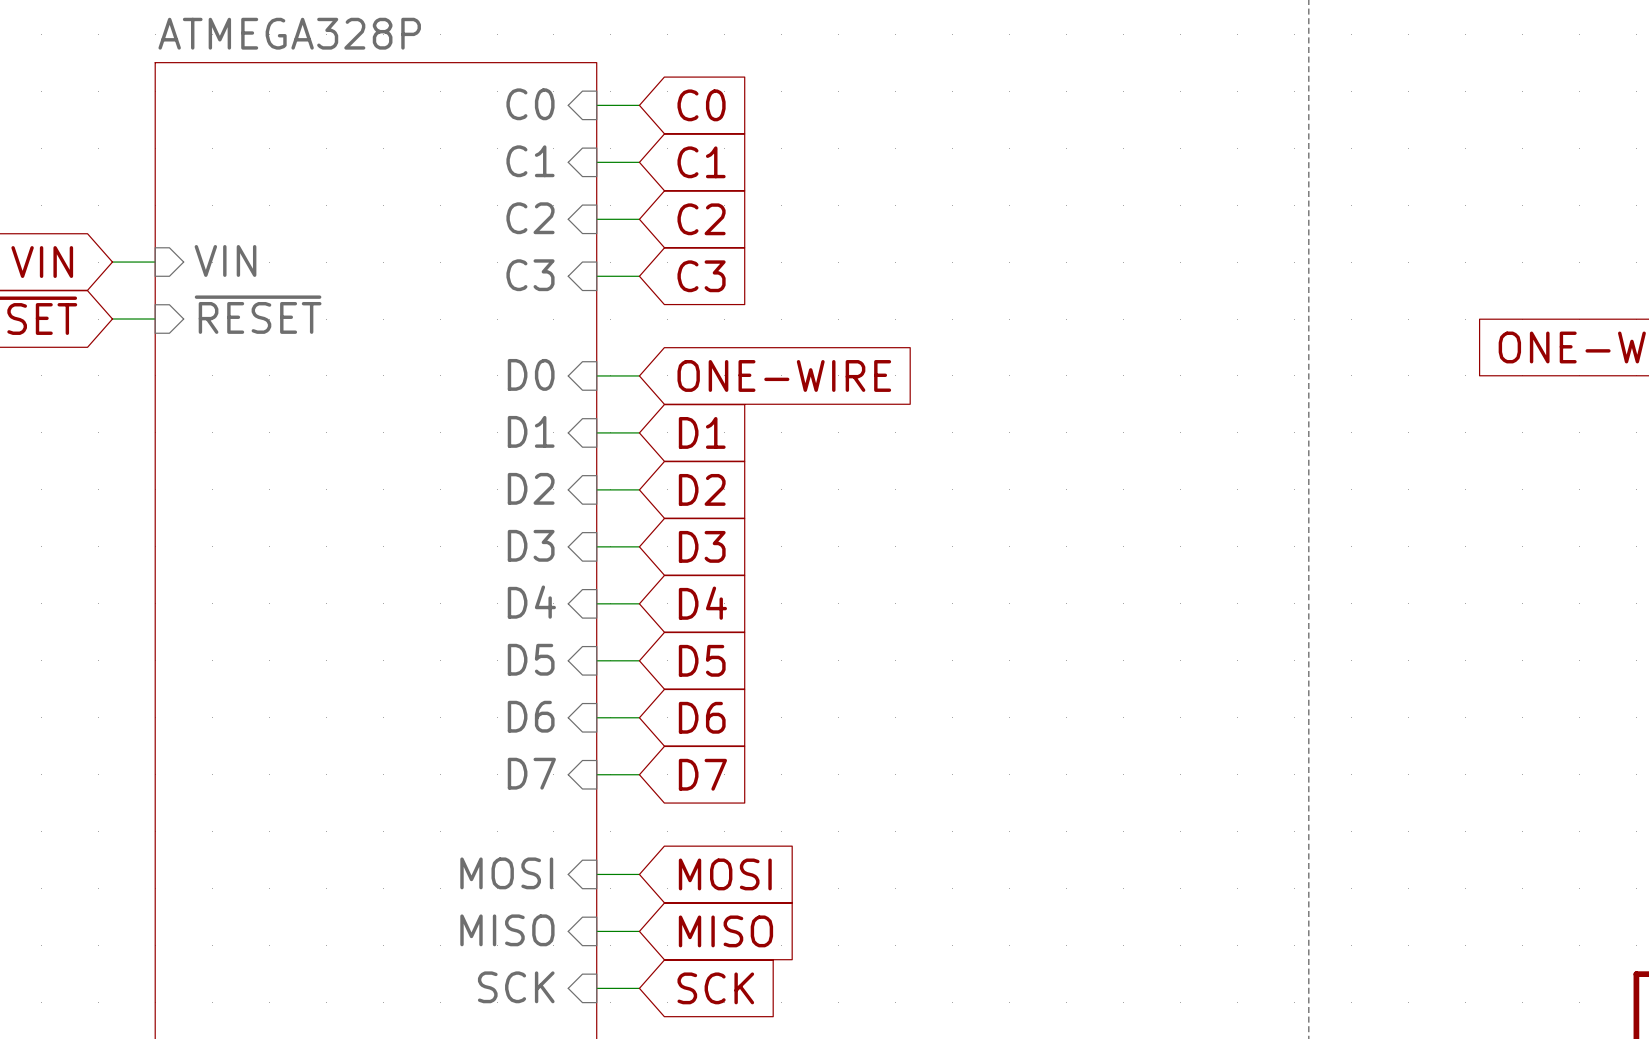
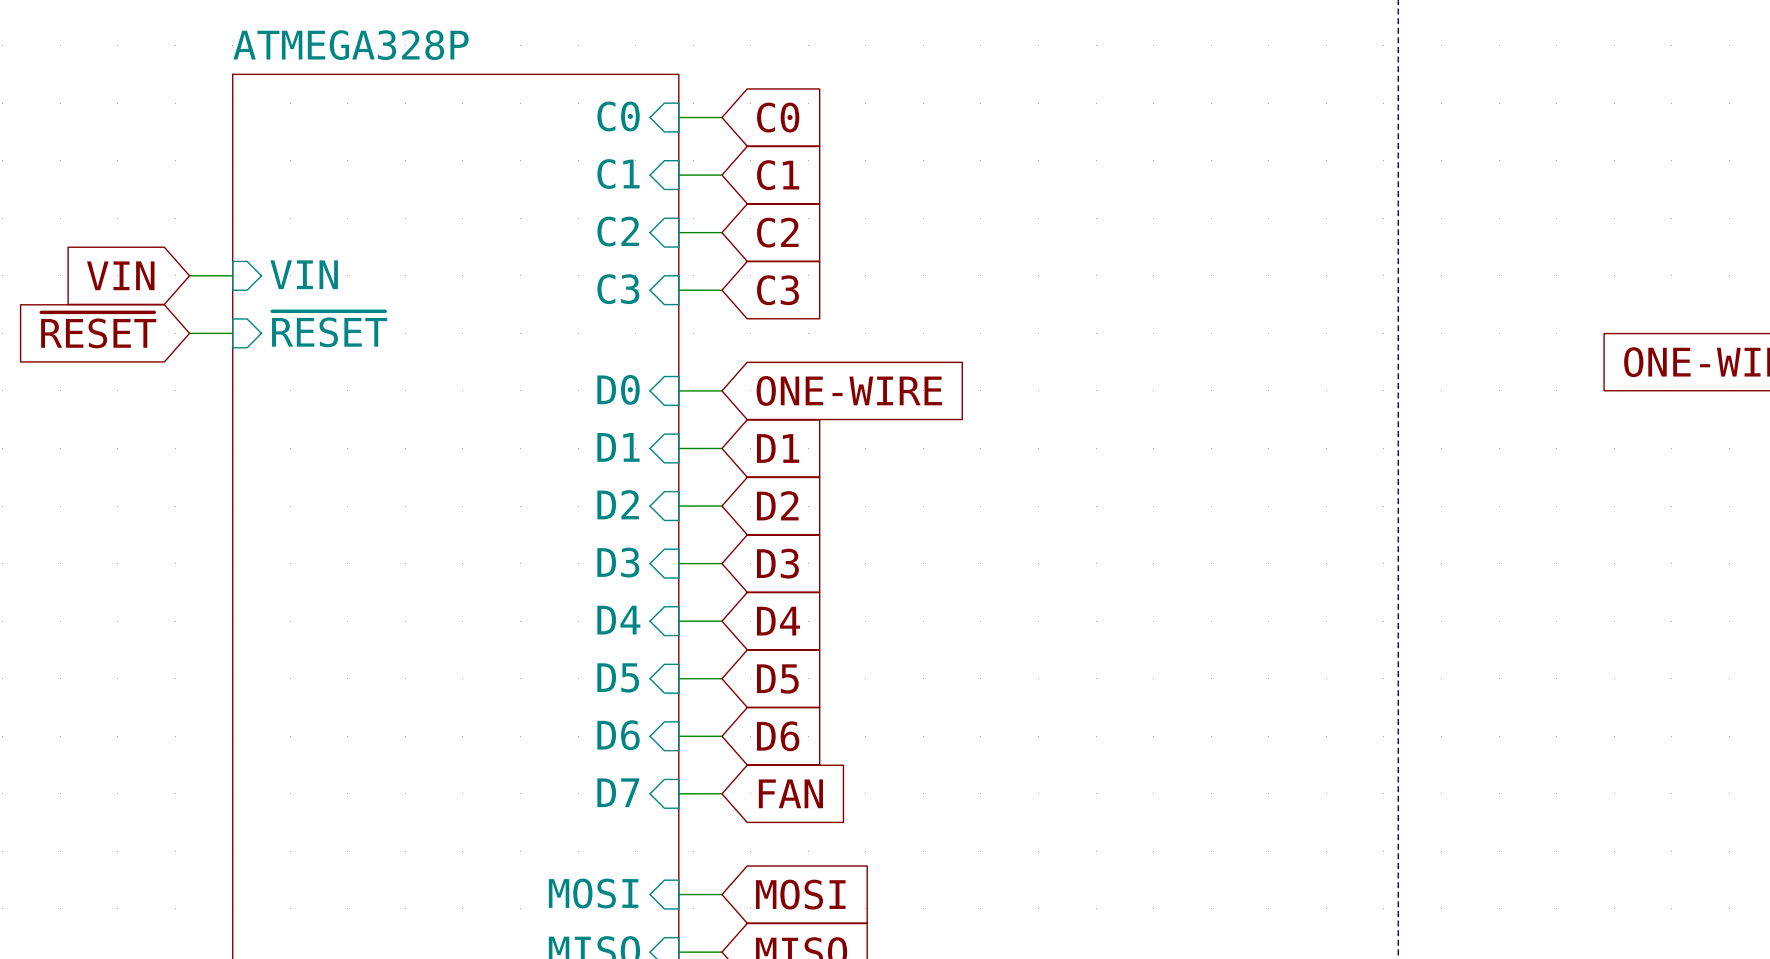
global label: D7 (702, 774) -> FAN (790, 793)

